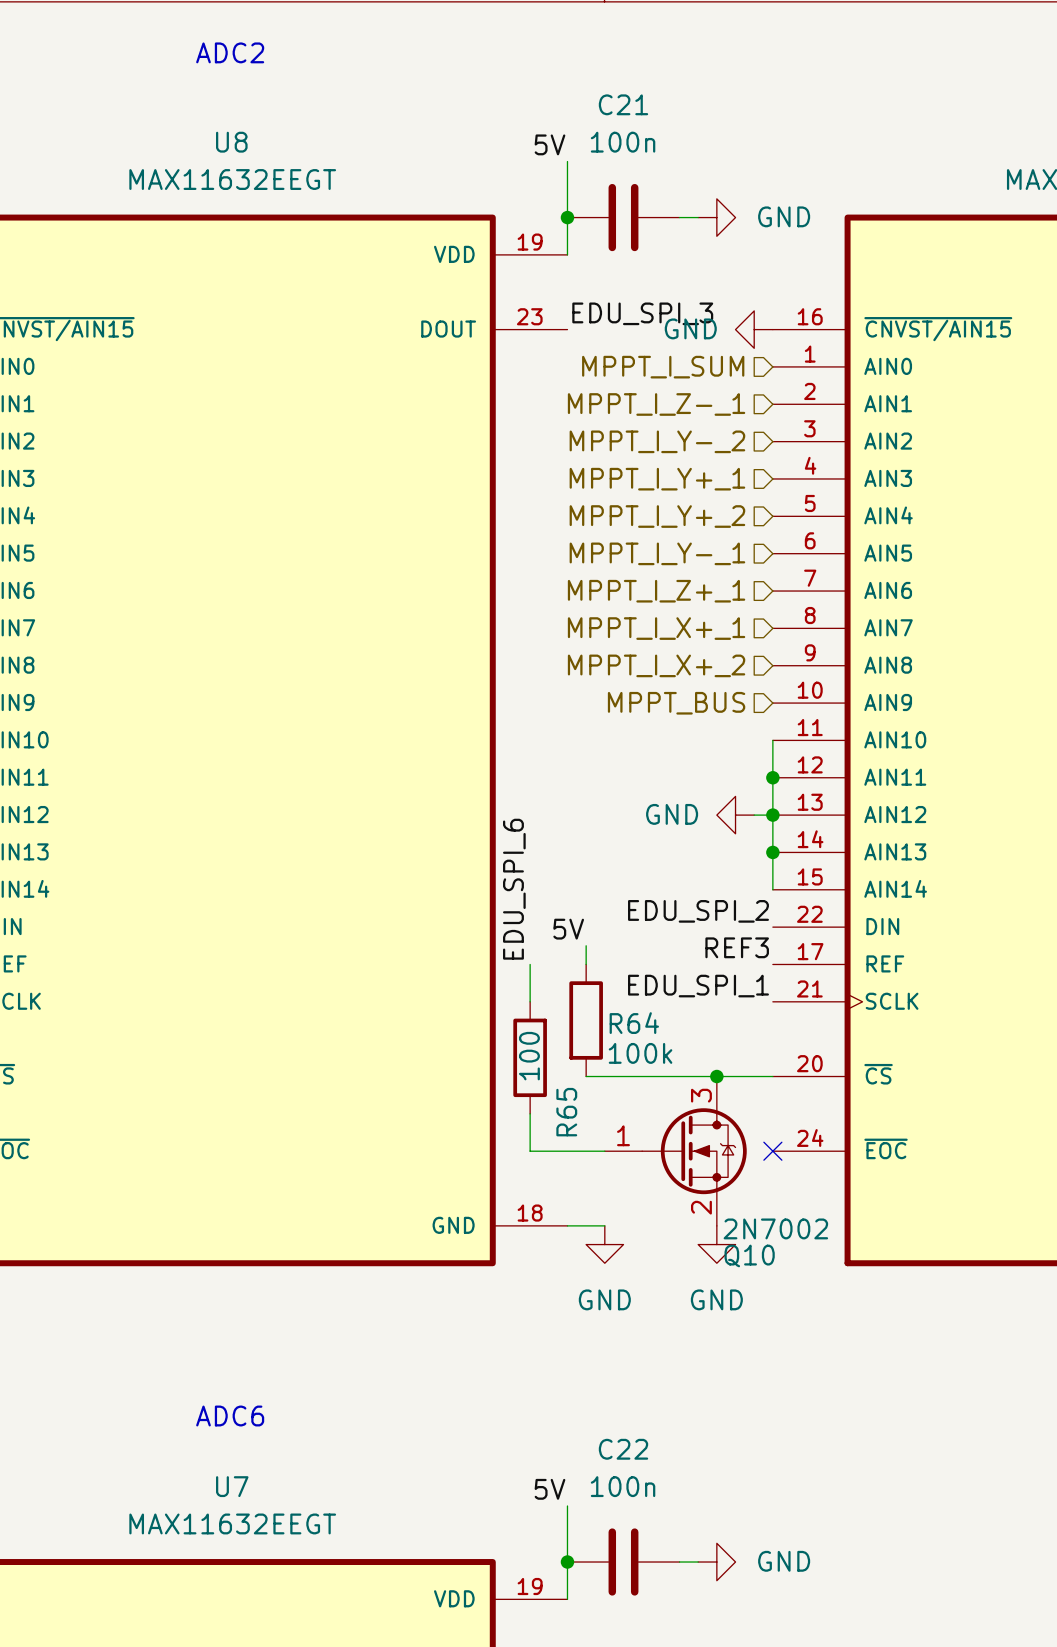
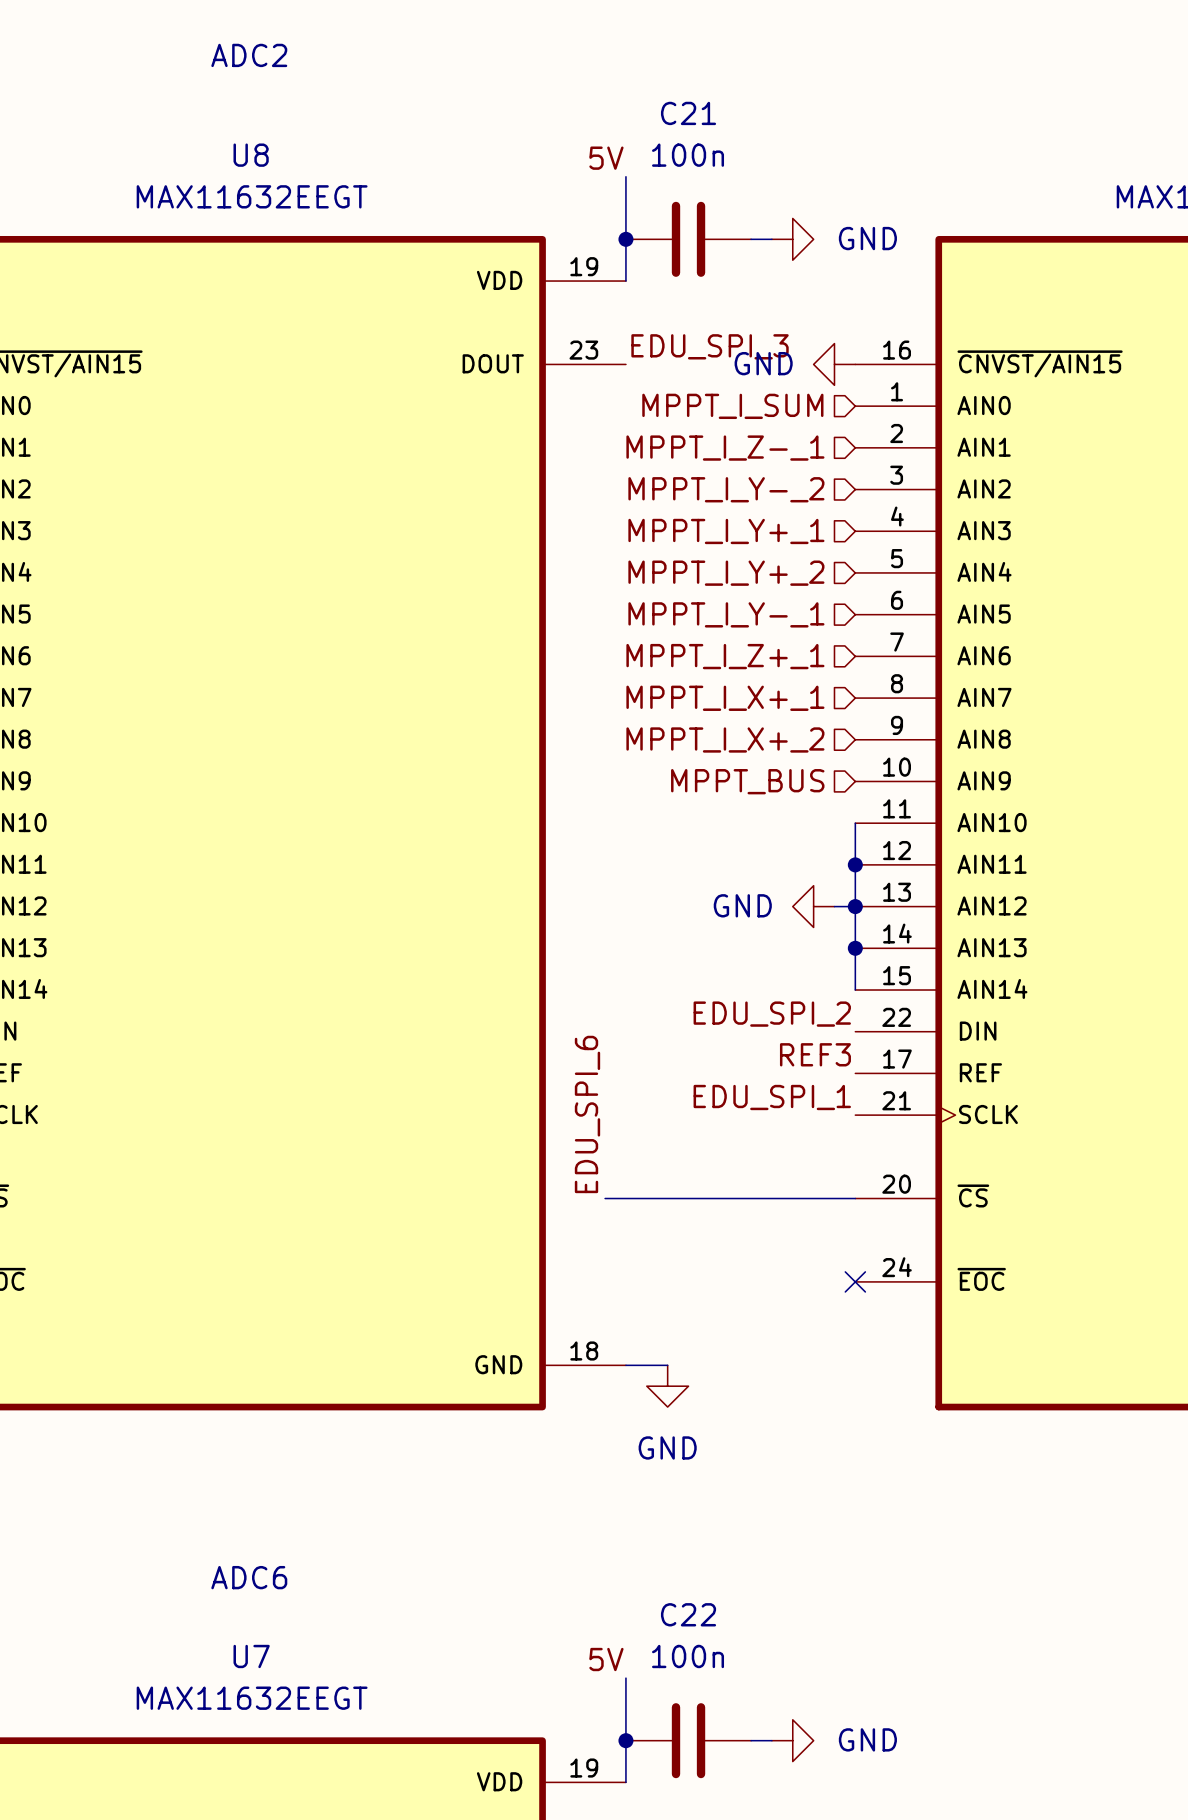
label position: EDU_SPI_6 (514, 889) -> EDU_SPI_6 (587, 1114)
label: 5V (568, 929) -> none
wire: (586, 945) (586, 964) -> none
wire: (530, 964) (530, 1001) -> none
R64: 100k (586, 1020) -> none
R65: 100 (530, 1057) -> none
wire: none -> (605, 1198) (646, 1198)
junction: (716, 1076) -> none
wire: (530, 1113) (530, 1151) (604, 1151) -> none
Q10: 2N7002 (675, 1151) -> none
power symbol: GND (716, 1244) -> none

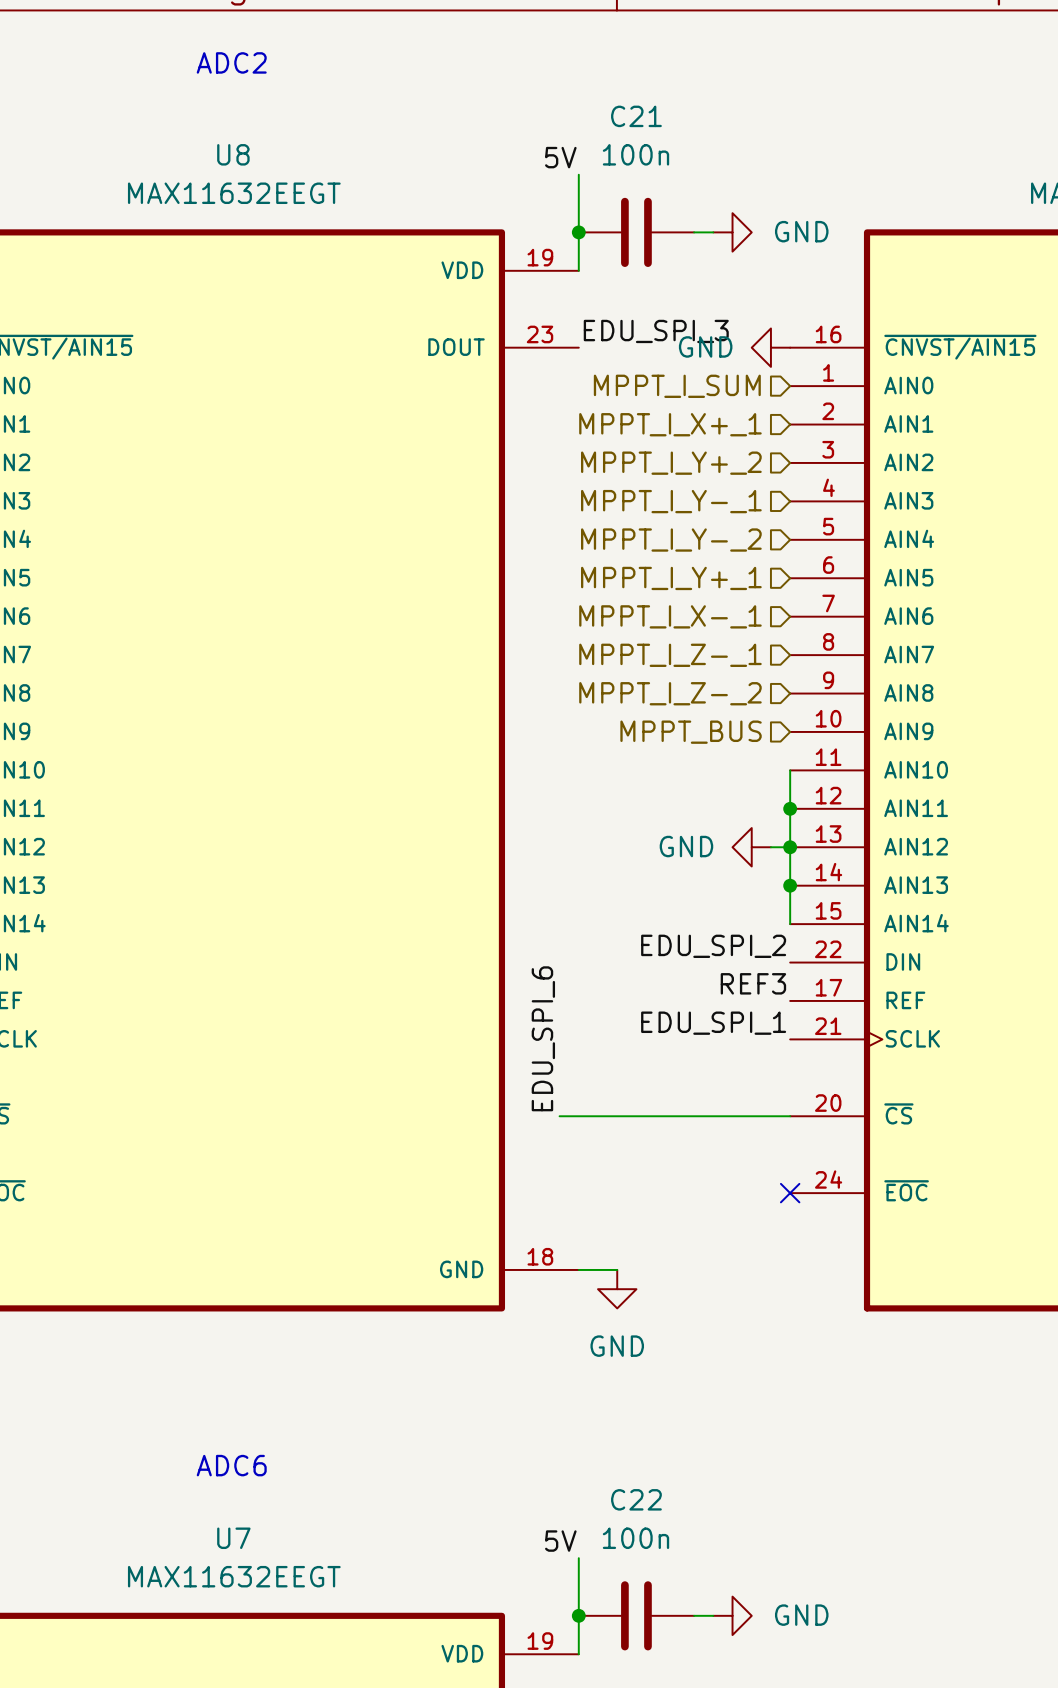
hierarchical label: MPPT_I_Z-_1 (725, 448) -> MPPT_I_X+_1 (670, 424)
hierarchical label: MPPT_I_Y-_2 (726, 489) -> MPPT_I_Y+_2 (671, 463)
hierarchical label: MPPT_I_Y+_1 (726, 531) -> MPPT_I_Y-_1 (671, 501)
hierarchical label: MPPT_I_Y+_2 (726, 573) -> MPPT_I_Y-_2 (671, 540)
hierarchical label: MPPT_I_Y-_1 (726, 614) -> MPPT_I_Y+_1 (671, 578)
hierarchical label: MPPT_I_Z+_1 (725, 656) -> MPPT_I_X-_1 (670, 616)
hierarchical label: MPPT_I_X+_1 (725, 698) -> MPPT_I_Z-_1 (670, 655)
hierarchical label: MPPT_I_X+_2 (725, 739) -> MPPT_I_Z-_2 (670, 693)

